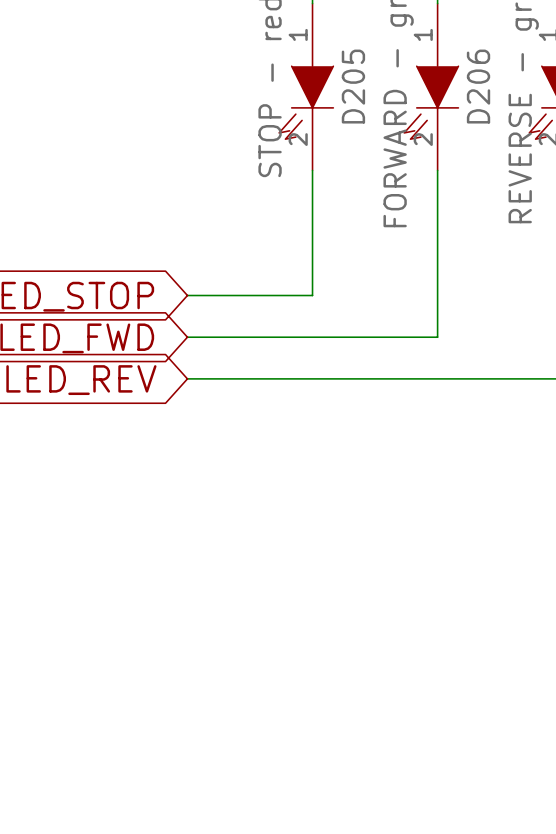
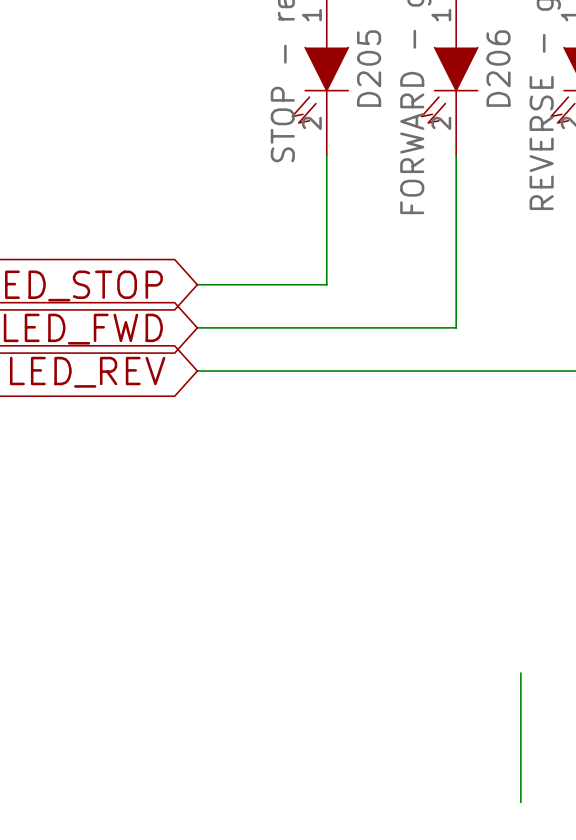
wire: none -> (520, 672) (520, 802)

